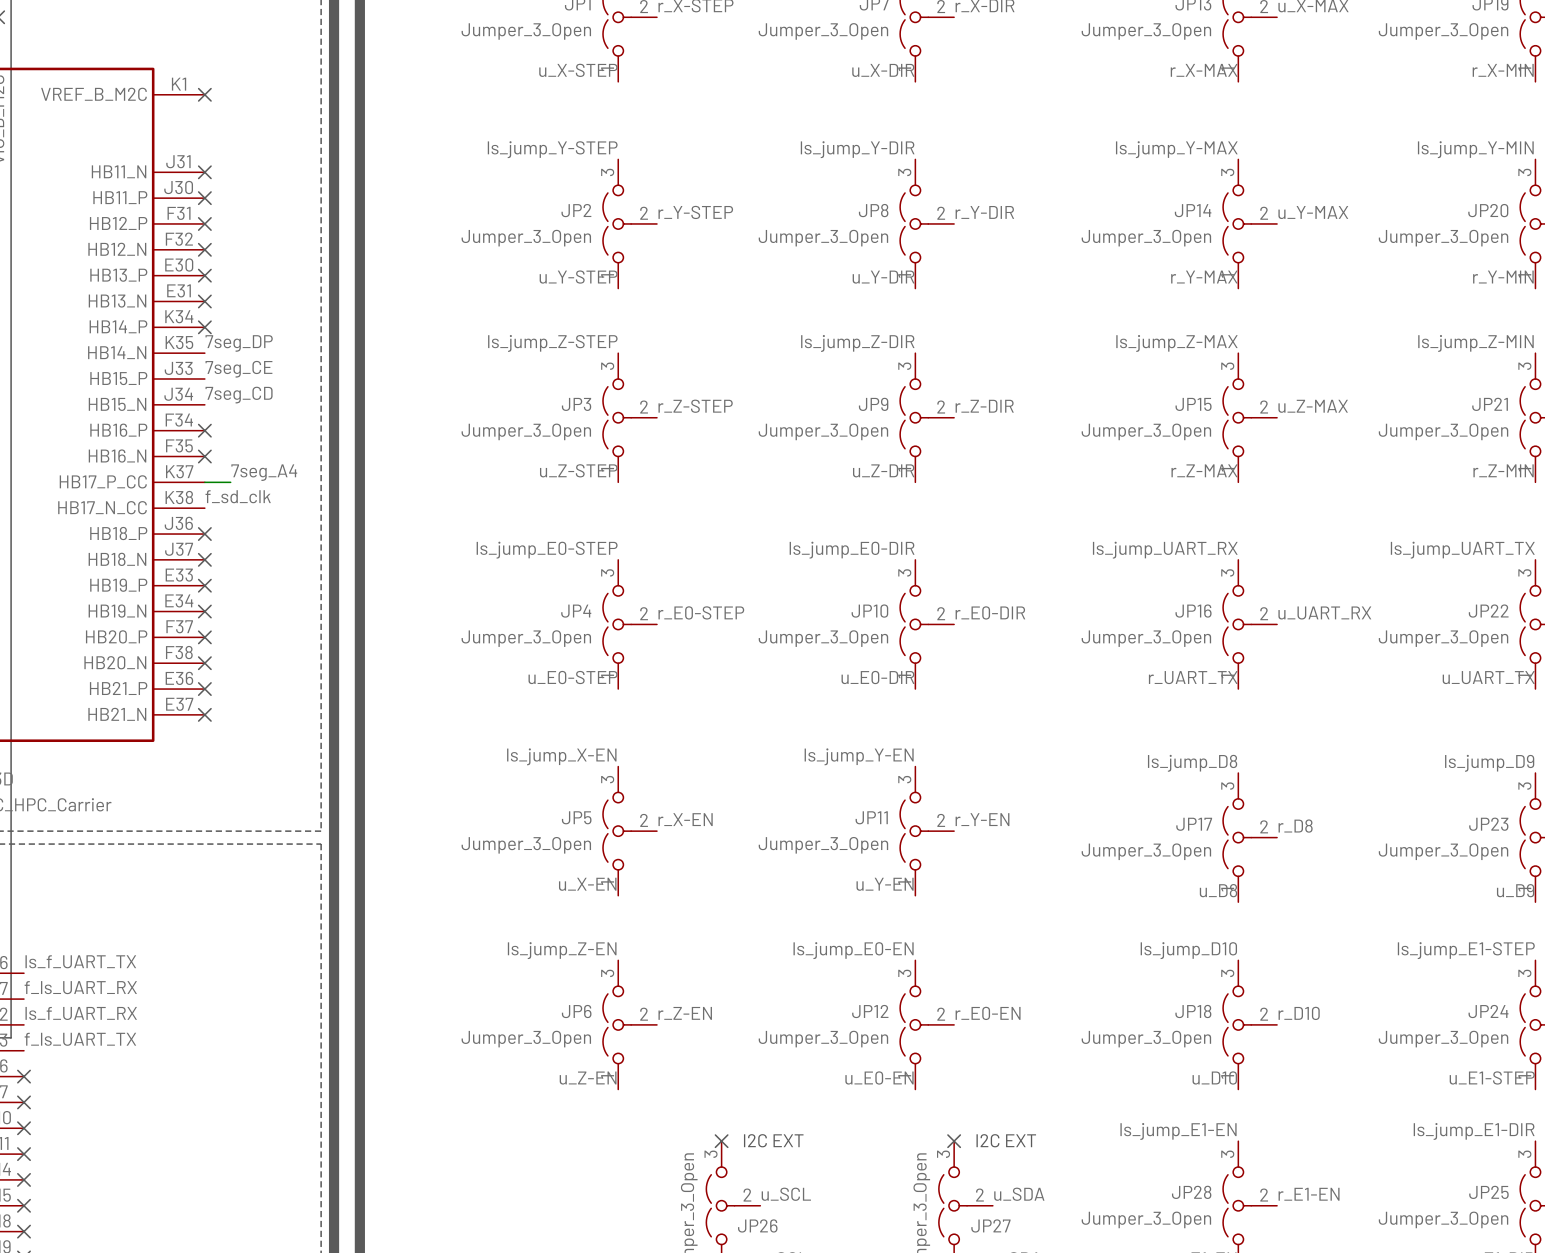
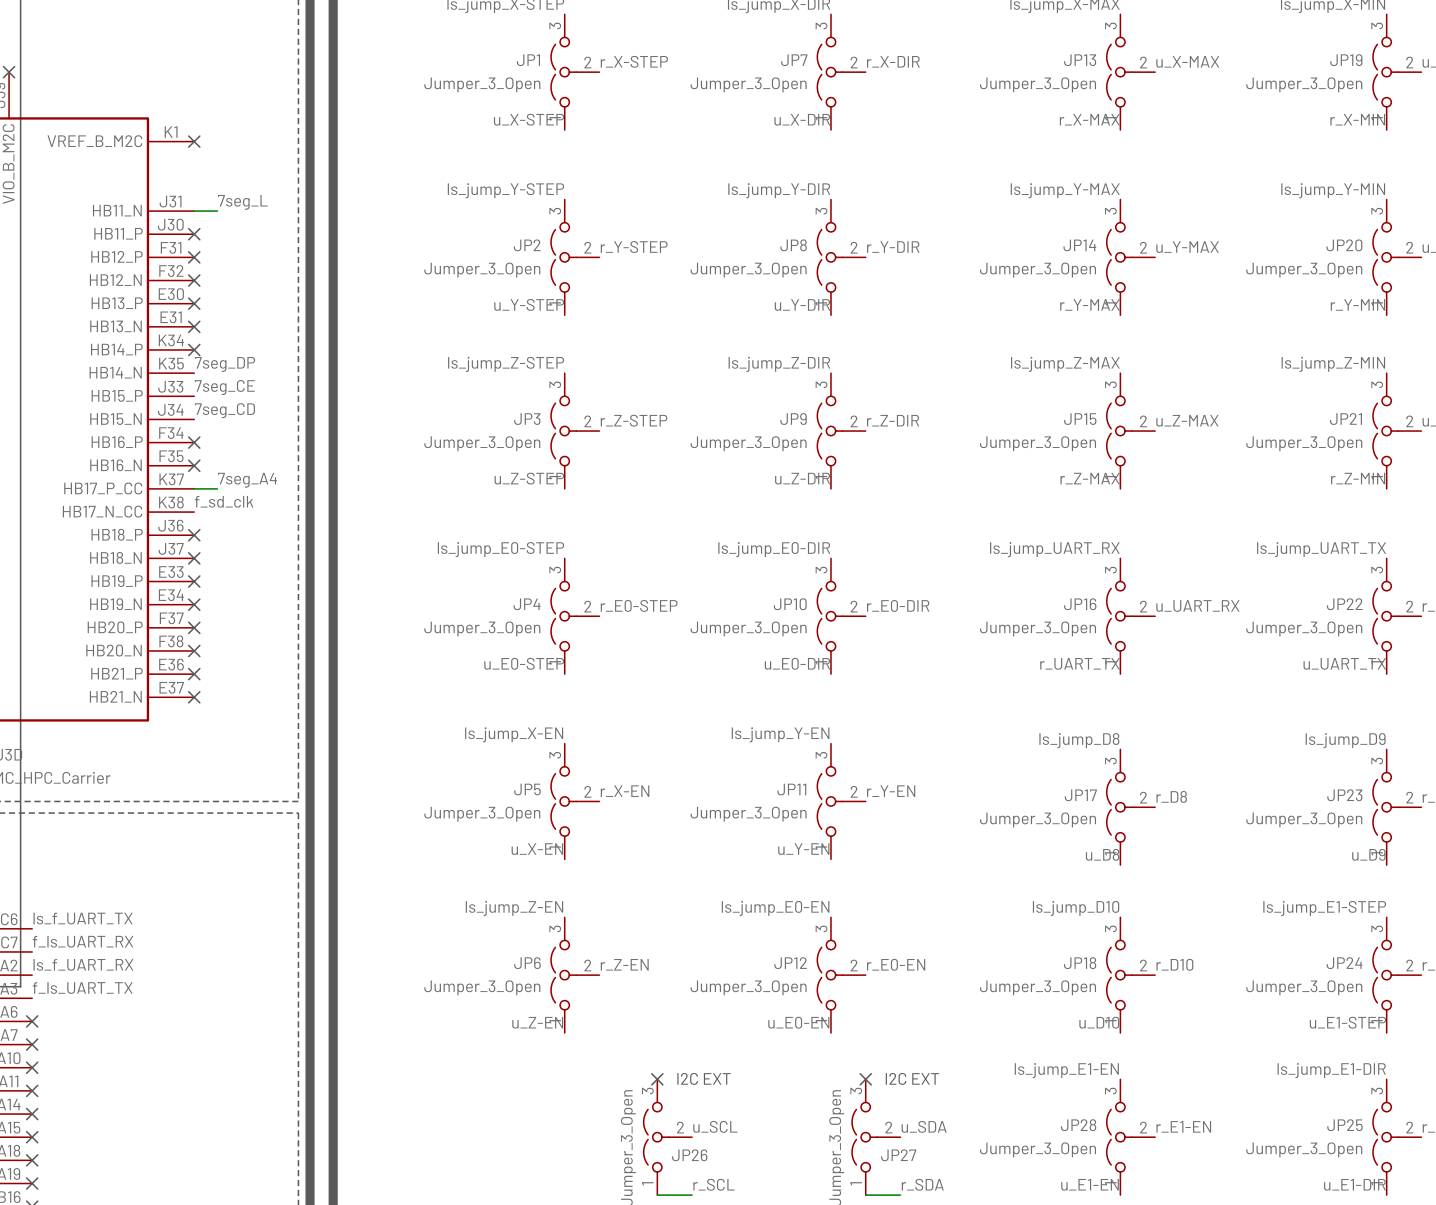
label: none -> 7seg_L (242, 202)
wire: none -> (194, 211) (217, 211)
no-connect mark: (204, 172) -> none

